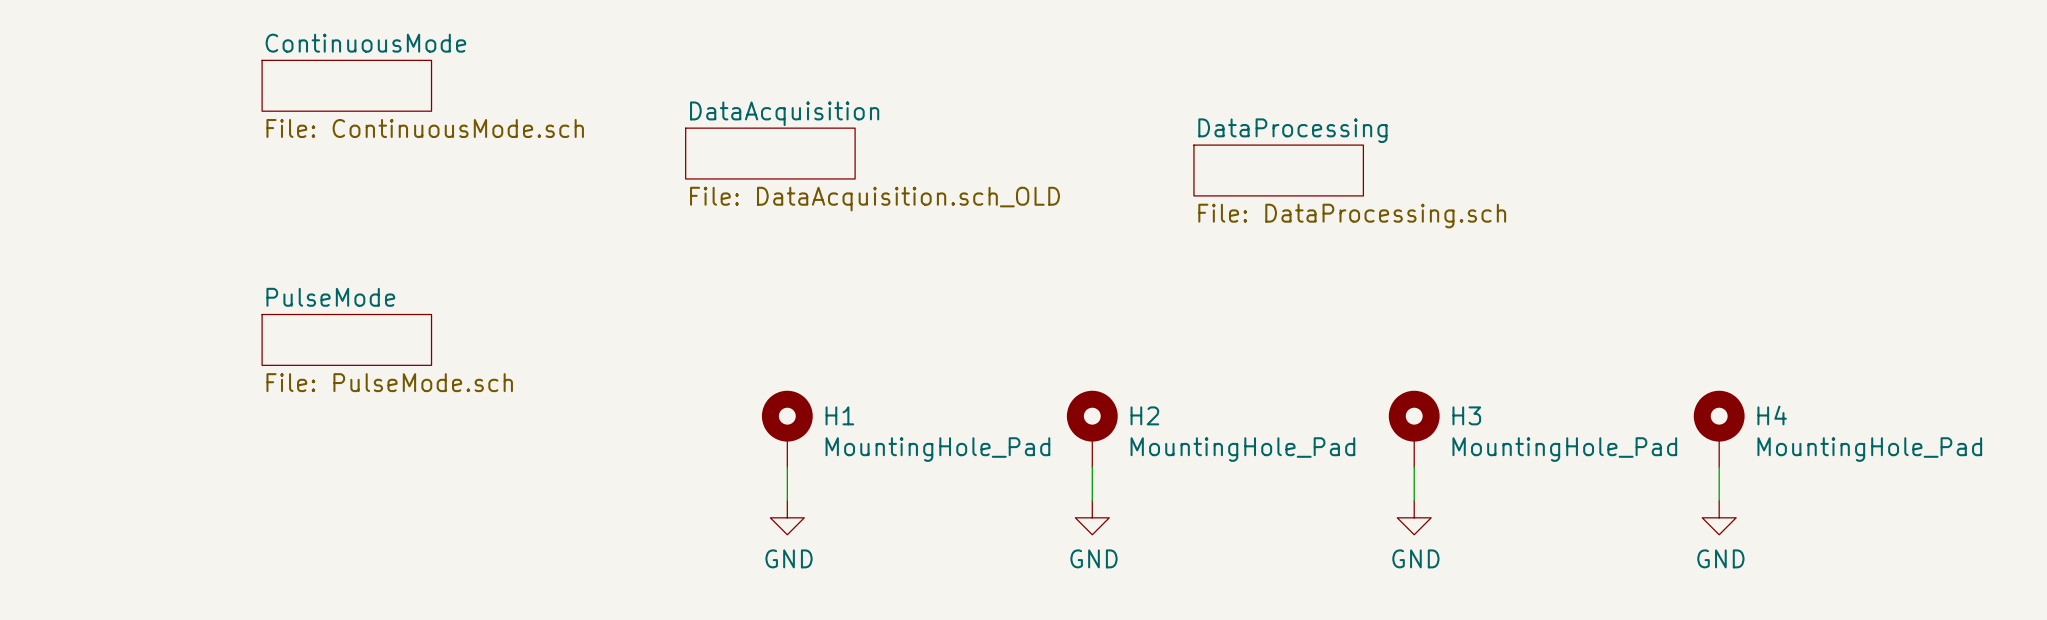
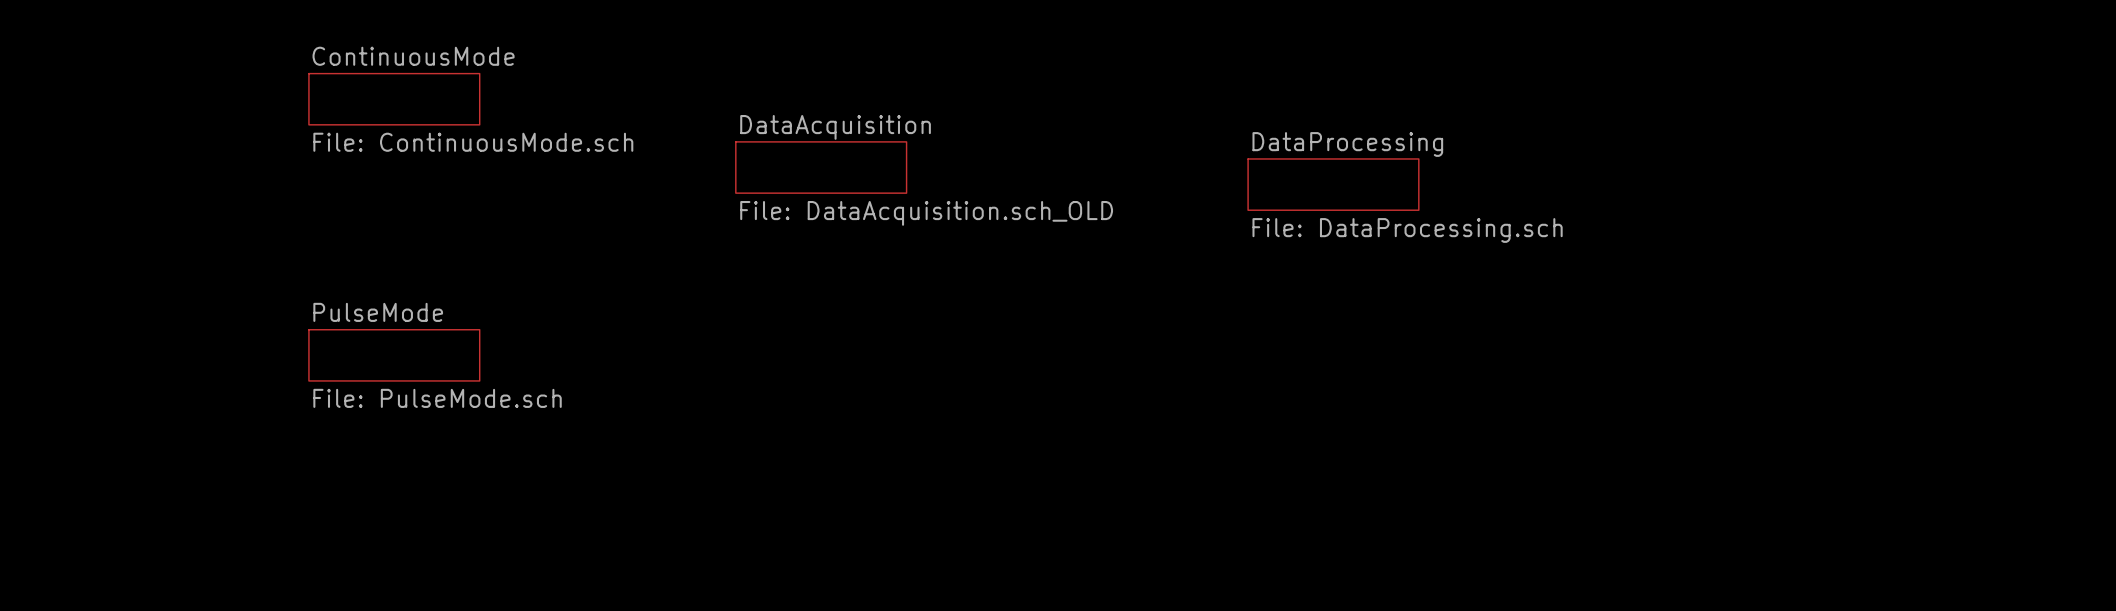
H1: MountingHole_Pad (787, 428) -> none
H2: MountingHole_Pad (1092, 428) -> none
H3: MountingHole_Pad (1414, 428) -> none
H4: MountingHole_Pad (1719, 428) -> none
wire: (787, 467) (787, 500) -> none
wire: (1092, 467) (1092, 500) -> none
wire: (1414, 467) (1414, 500) -> none
wire: (1719, 467) (1719, 500) -> none
power symbol: GND (787, 517) -> none
power symbol: GND (1092, 517) -> none
power symbol: GND (1414, 517) -> none
power symbol: GND (1719, 517) -> none

